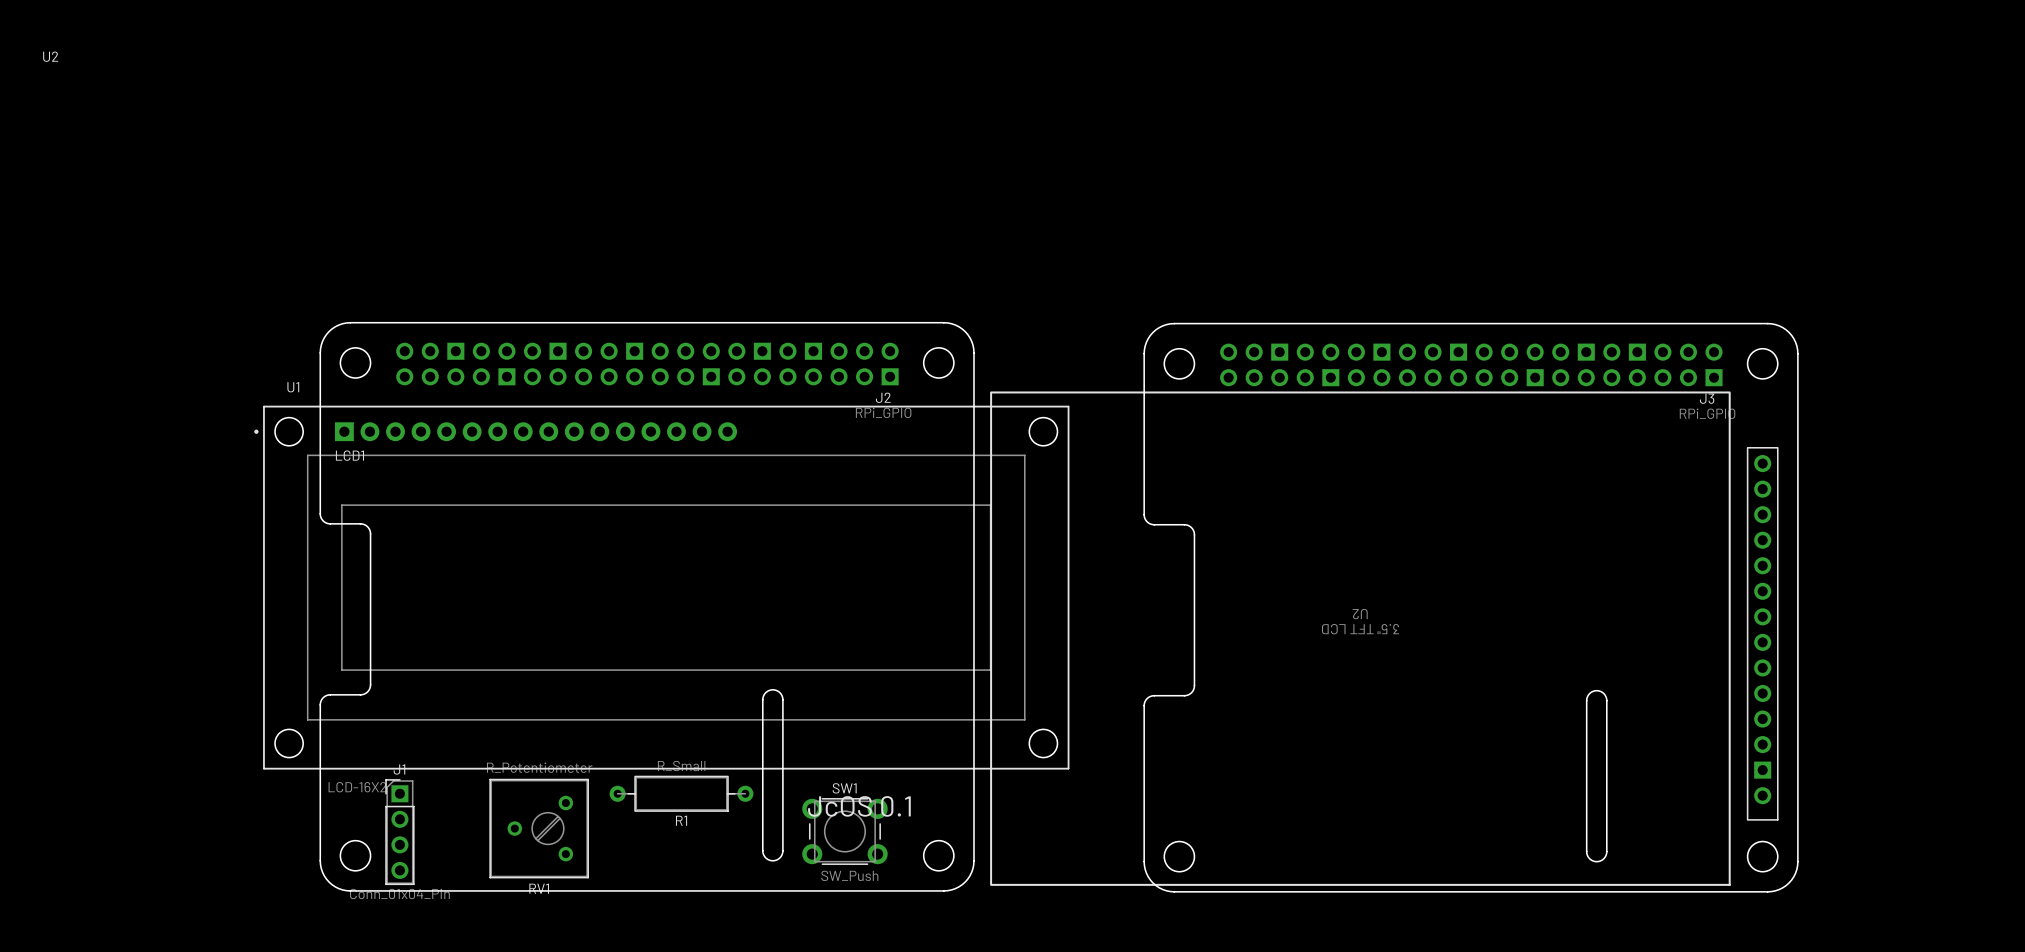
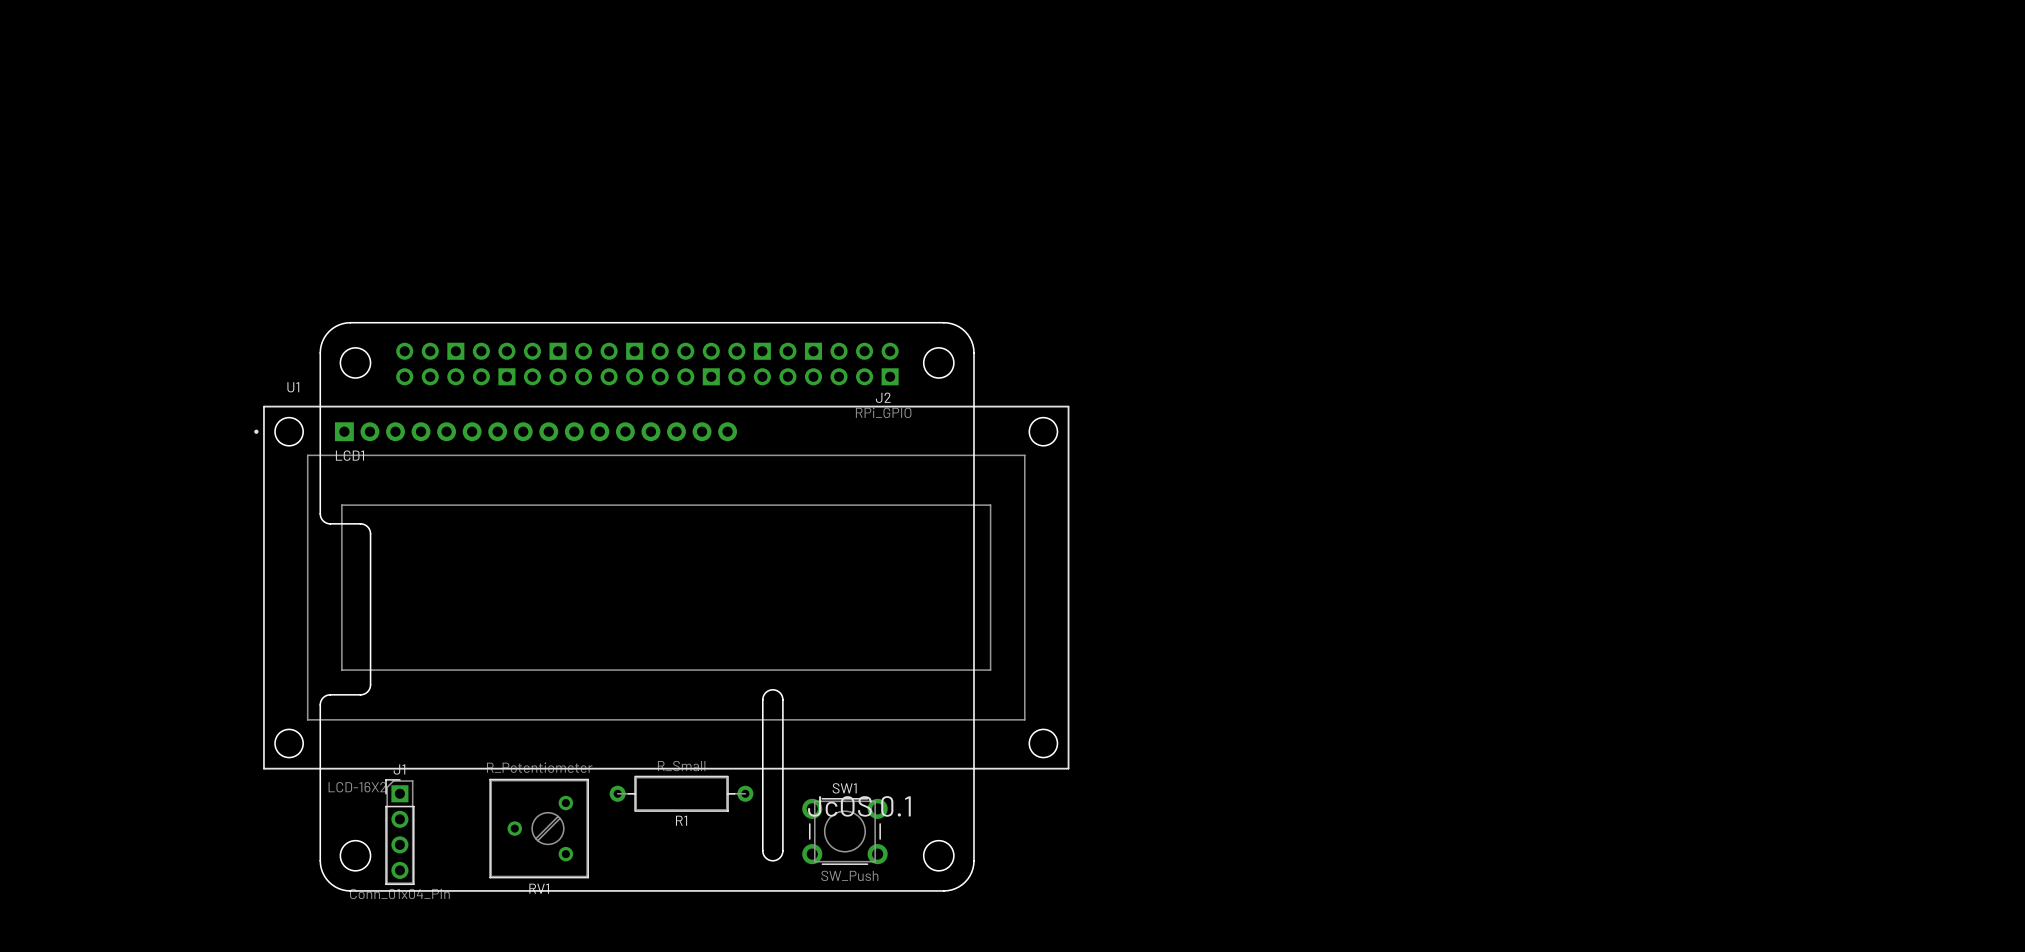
U2: (50, 56) -> none
J3: RPi_GPIO (1471, 607) -> none
U2: 3.5" TFT LCD (1384, 638) -> none

